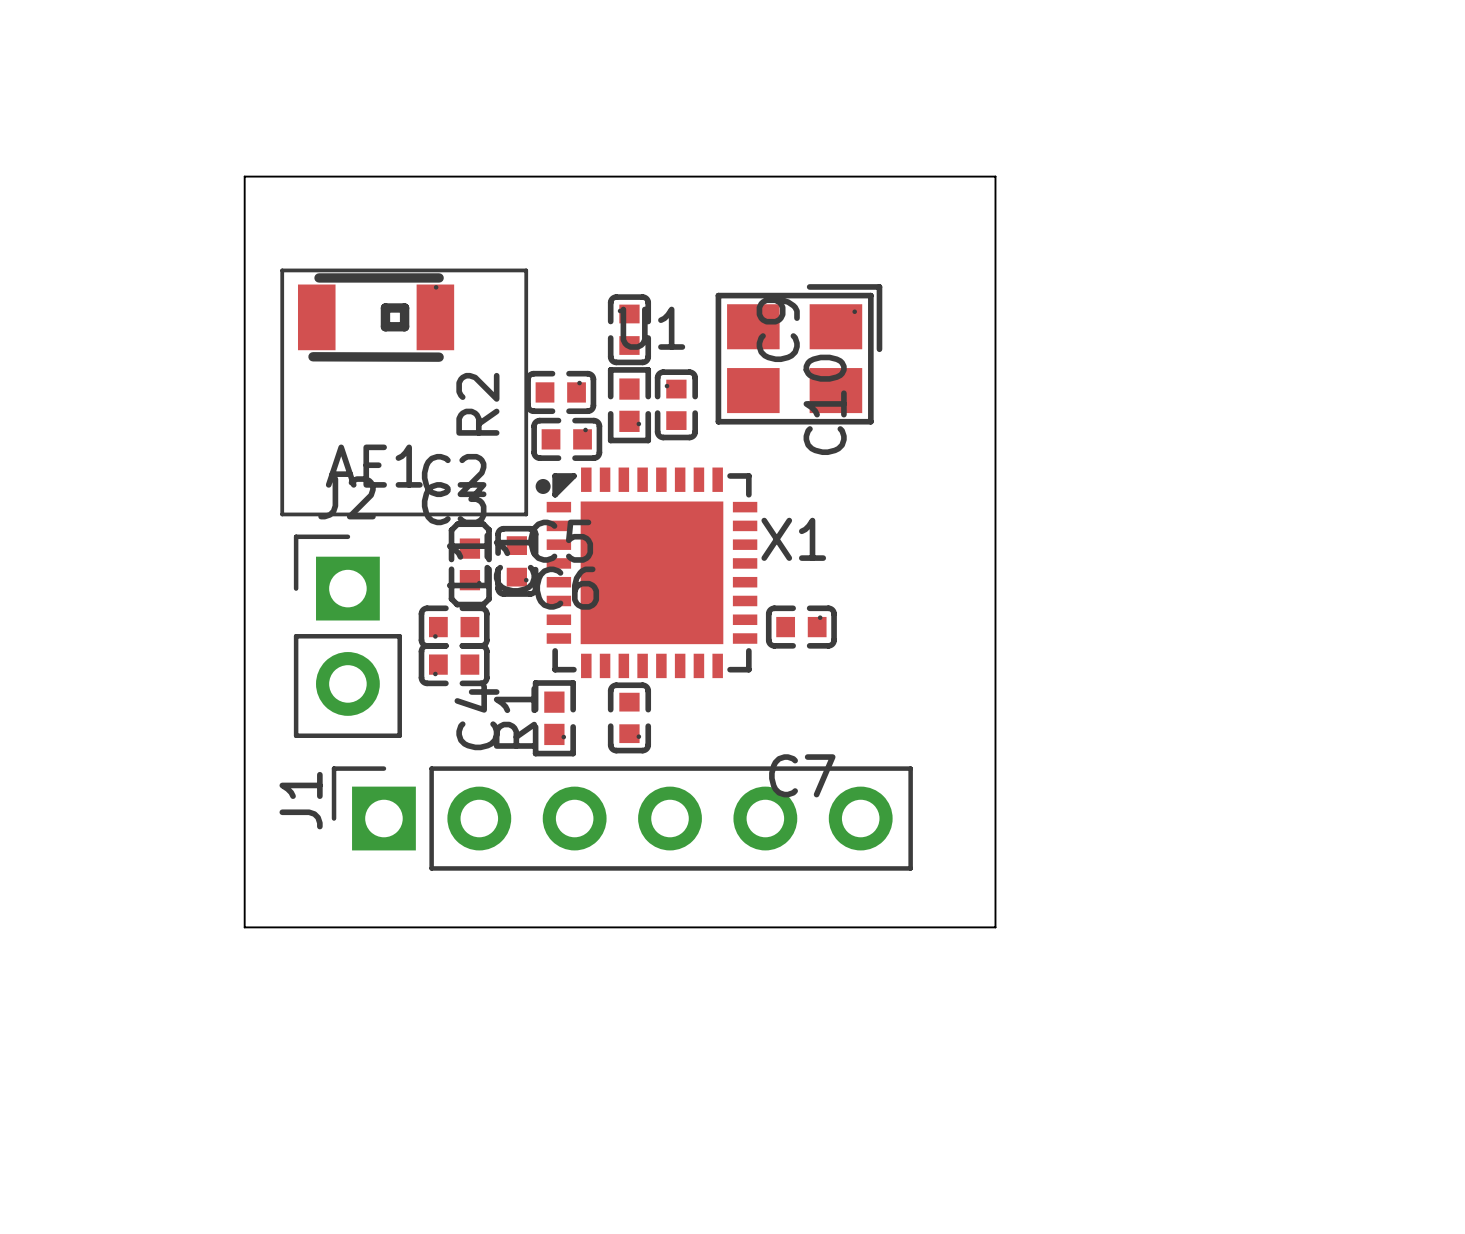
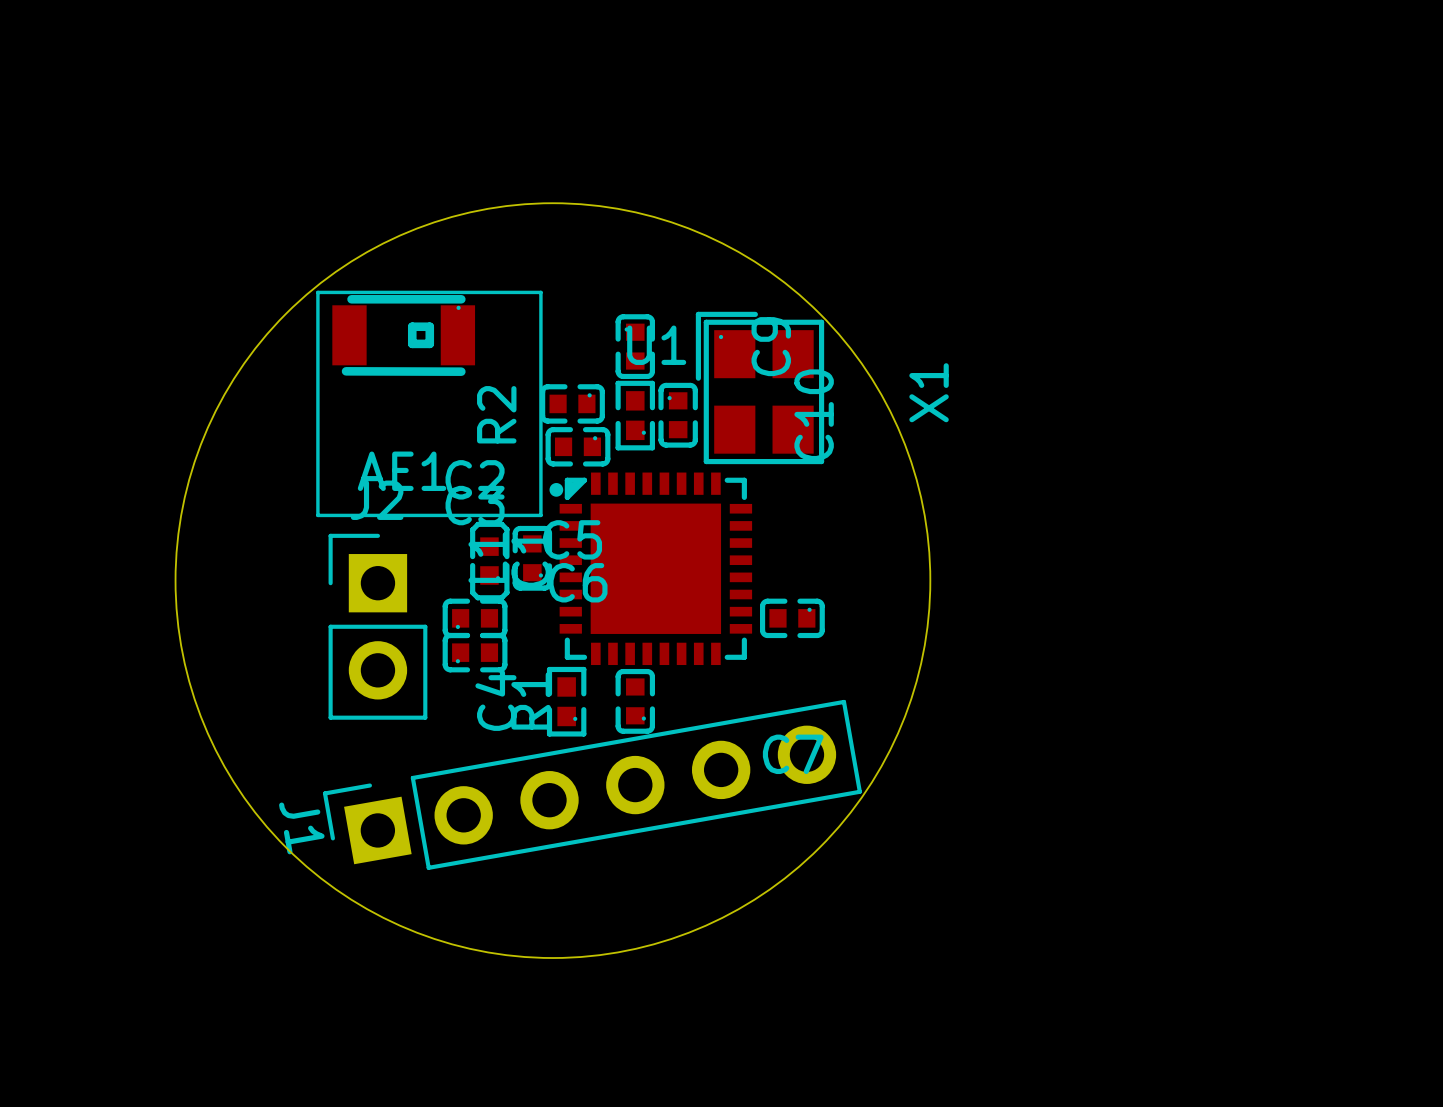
round board edge: none -> [174, 202, 932, 959]
board edge: (244, 176) (995, 176) (995, 927) (244, 927) (244, 176) -> none
X1 rotation: 0° (798, 354) -> 90° counterclockwise (759, 387)
J1 rotation: 0° (622, 818) -> 10° counterclockwise (592, 784)

